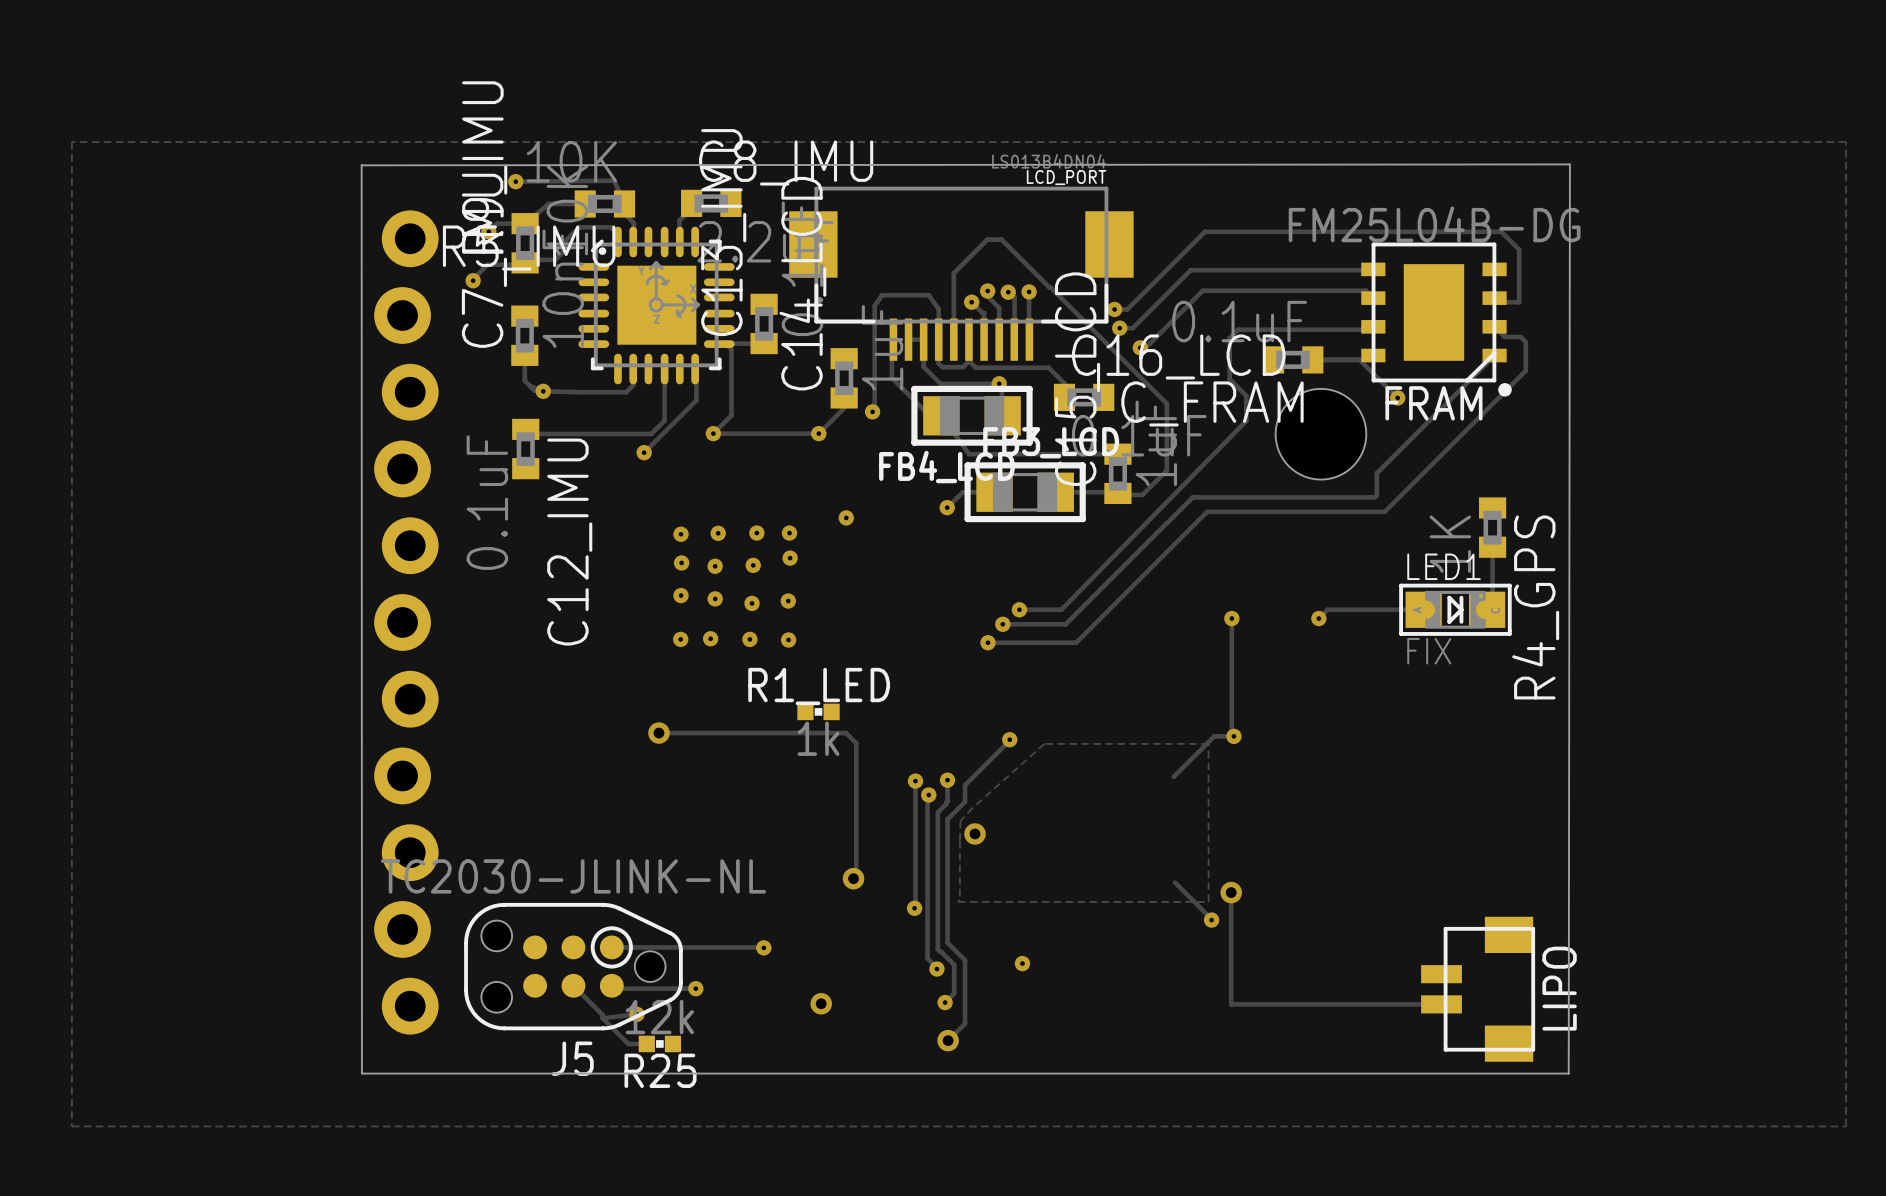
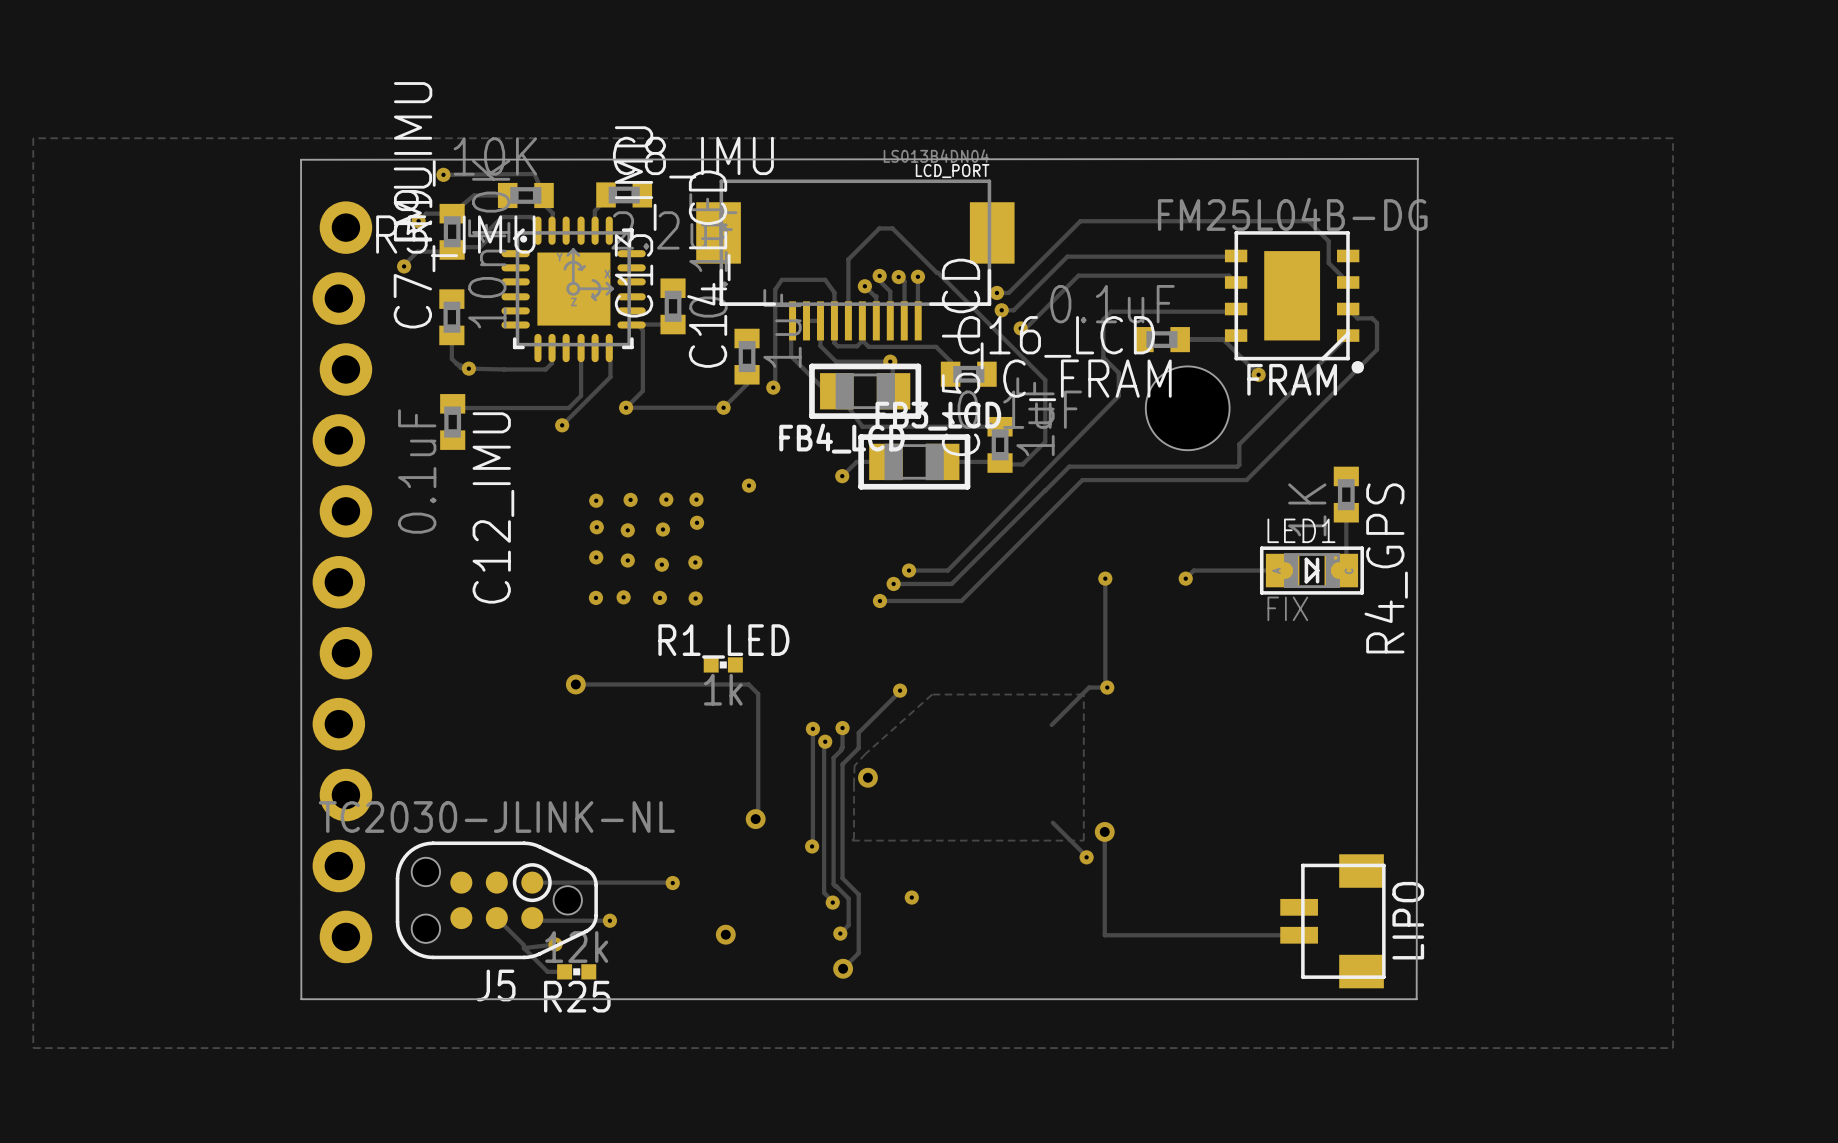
track: (1451, 231) (1501, 231) (1519, 249) (1519, 302) (1498, 302) -> (1308, 221) (1328, 241) (1328, 263) (1348, 282)

